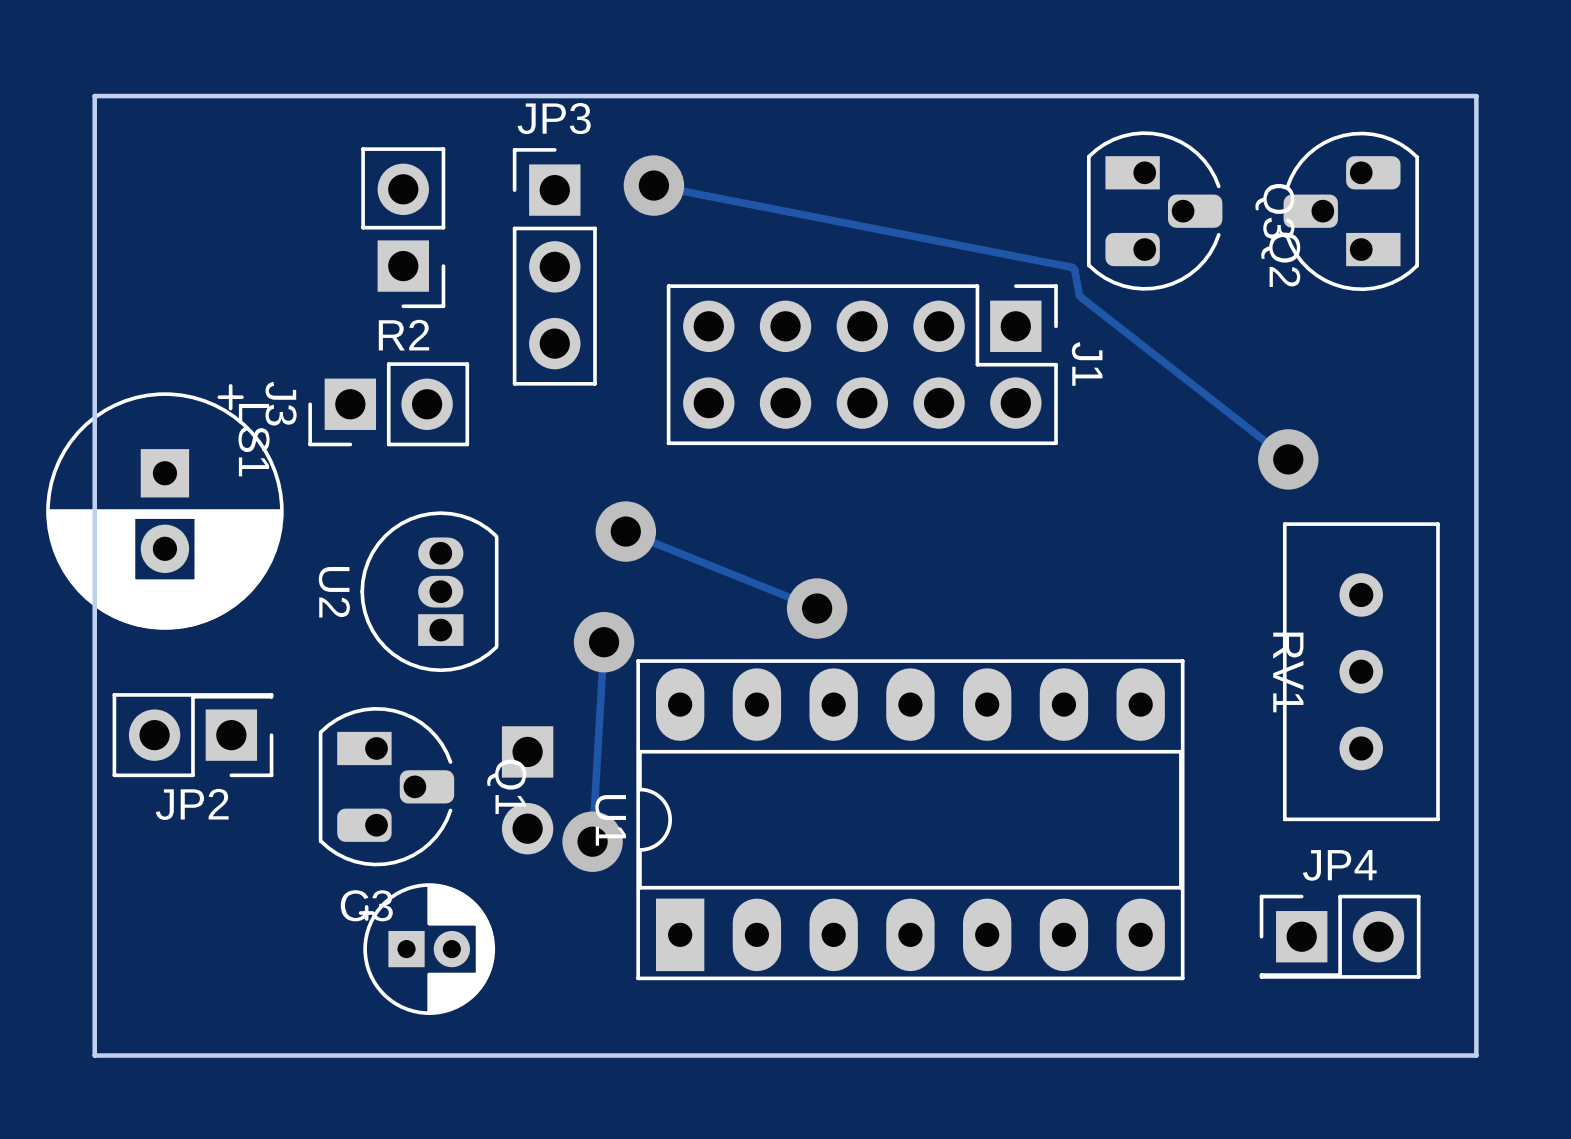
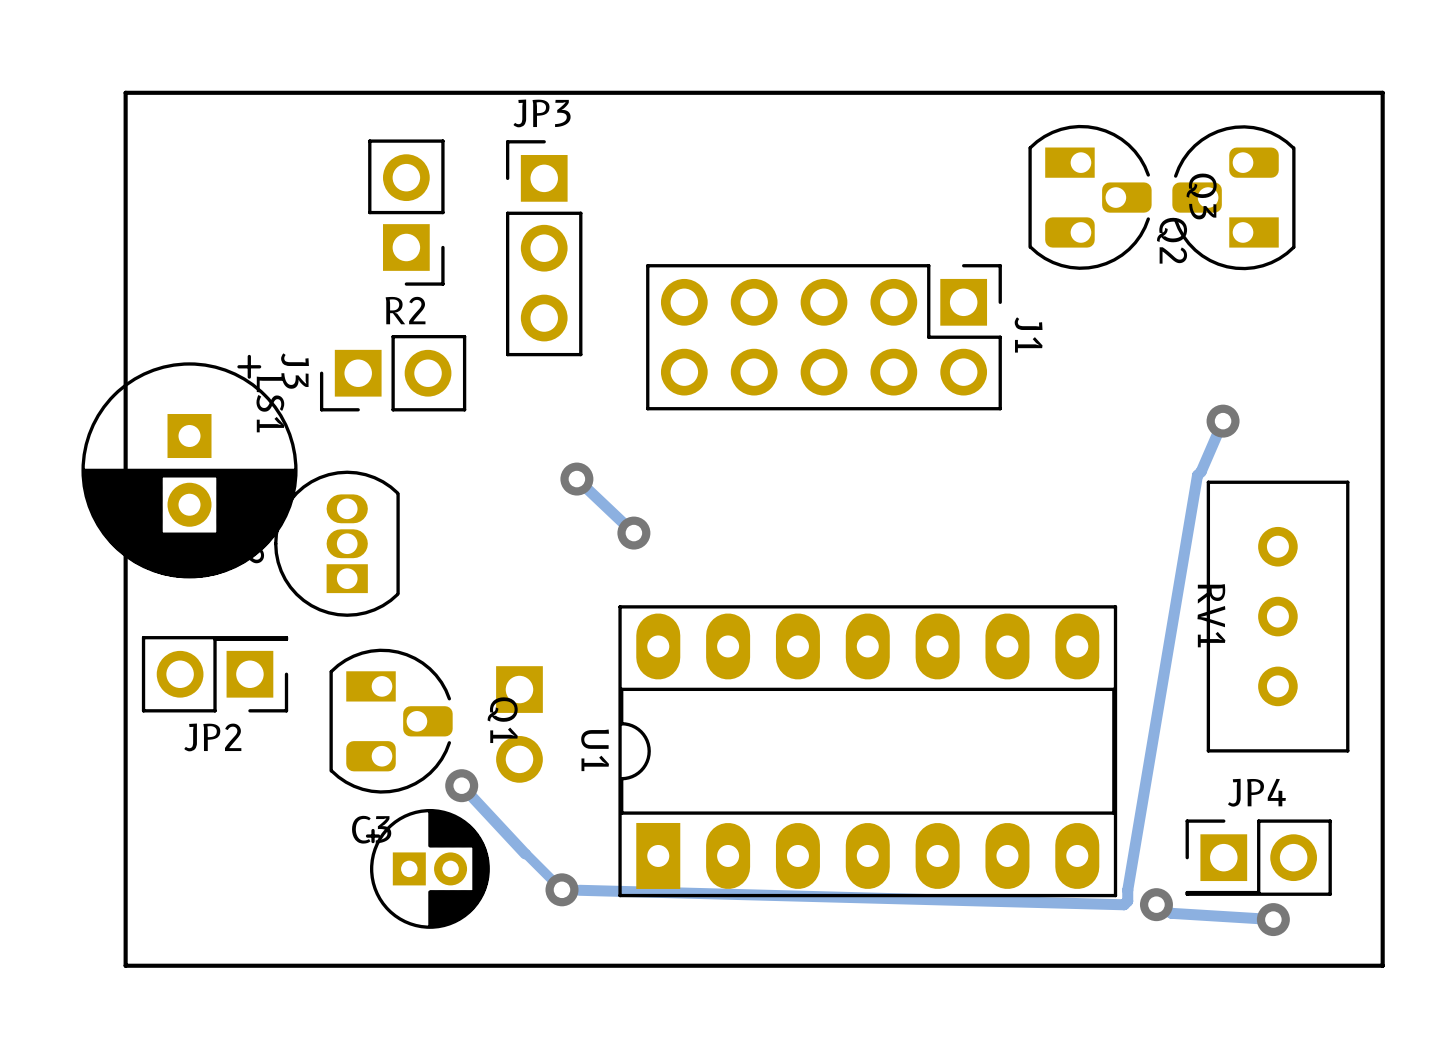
track: (653, 185) (1072, 267) (1074, 270) (1079, 295) (1082, 298) (1288, 459) -> none
via: (653, 185) -> none
Q2 position: (1351, 211) -> (1233, 197)
via size: [1258, 429, 1319, 490] -> [1206, 404, 1240, 438]
track: none -> (1223, 421) (1201, 471) (1197, 475) (1127, 890) (1127, 901) (1124, 904) (562, 890) (525, 853) (461, 785)
track: none -> (576, 479) (633, 533)
via: none -> (576, 479)
track: (625, 531) (817, 608) -> none
via: (625, 531) -> none
via: none -> (633, 533)
U2 position: (429, 591) -> (336, 543)
via: (817, 608) -> none
track: (604, 642) (592, 841) -> none
via: (604, 642) -> none
via: (592, 841) -> none
via: none -> (461, 785)
via: none -> (561, 889)
track: none -> (1156, 904) (1171, 913) (1273, 919)
via: none -> (1156, 904)
via: none -> (1273, 919)

